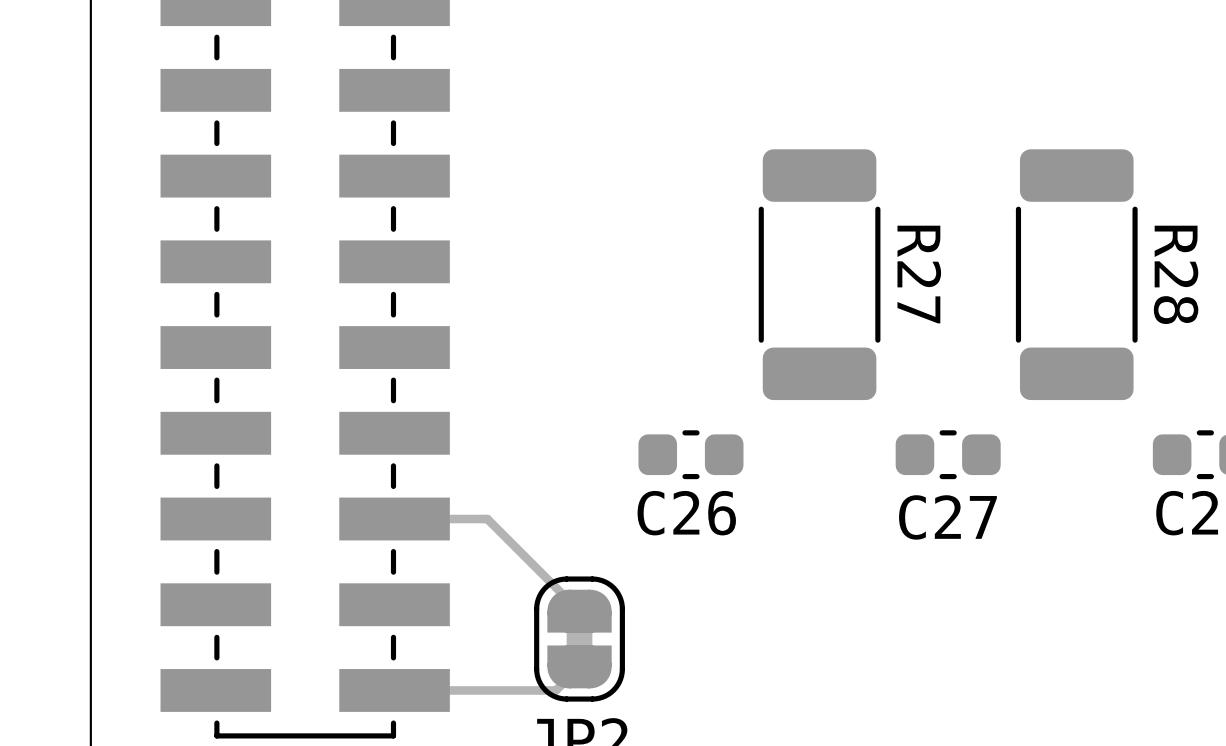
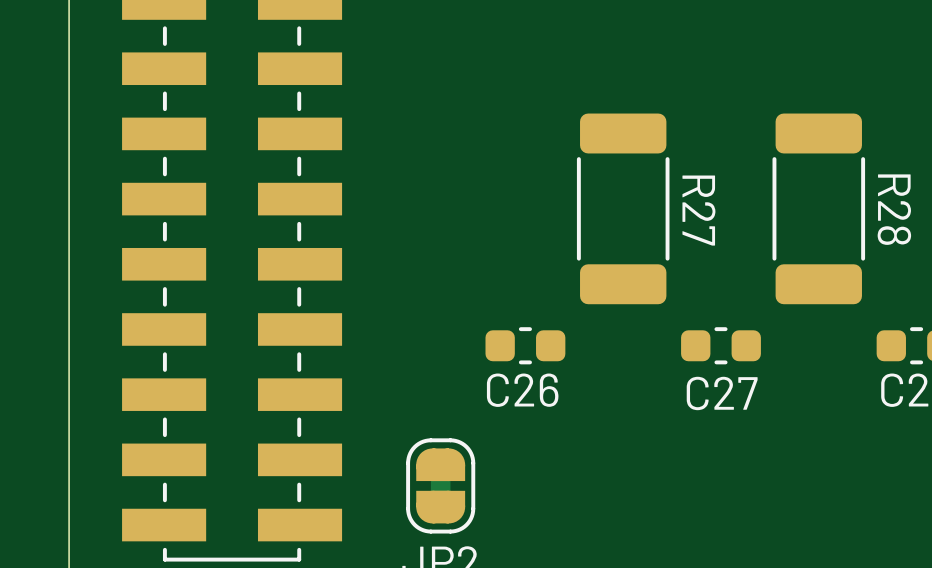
track: (394, 519) (487, 519) (579, 611) -> none
track: (579, 666) (555, 690) (394, 690) -> none

